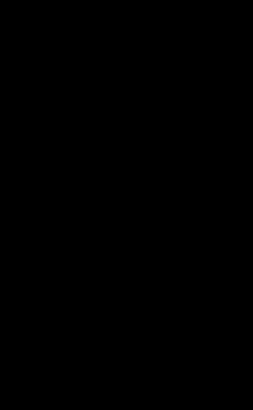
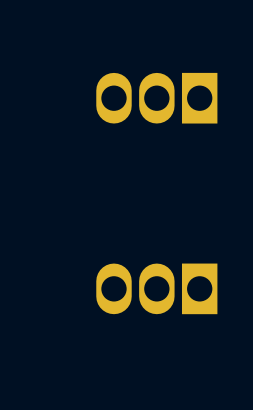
part: none -> (156, 98)
part: none -> (156, 288)

